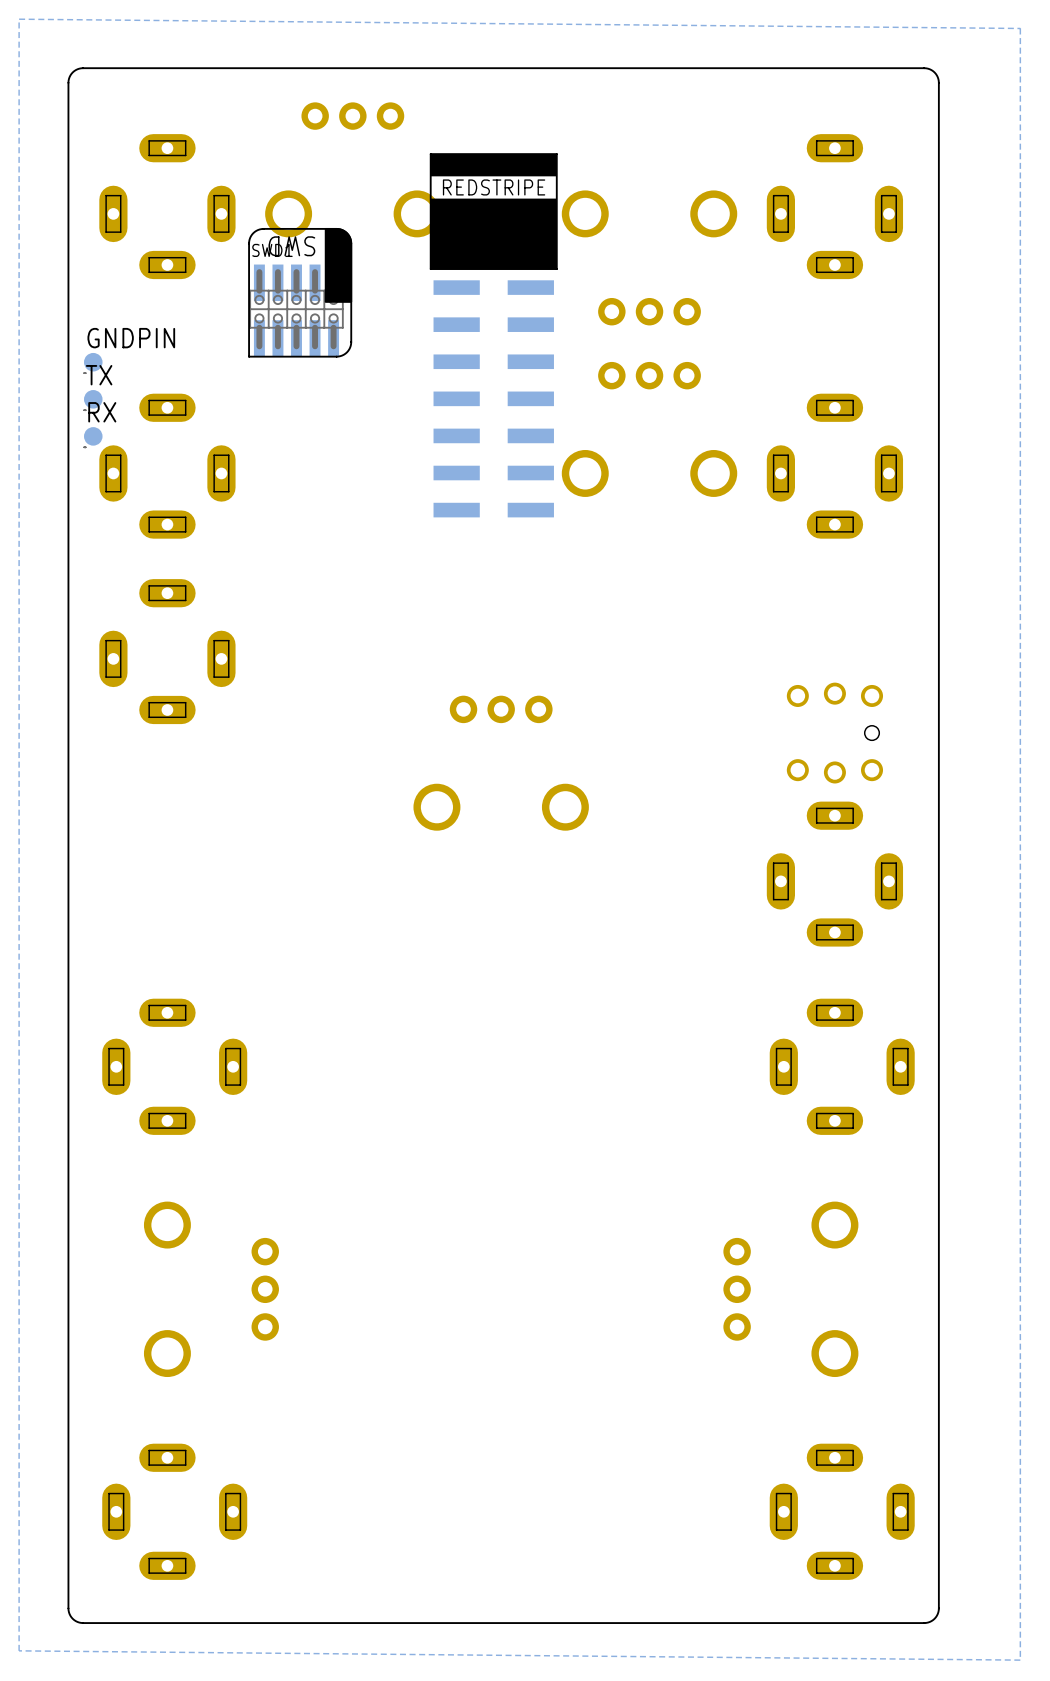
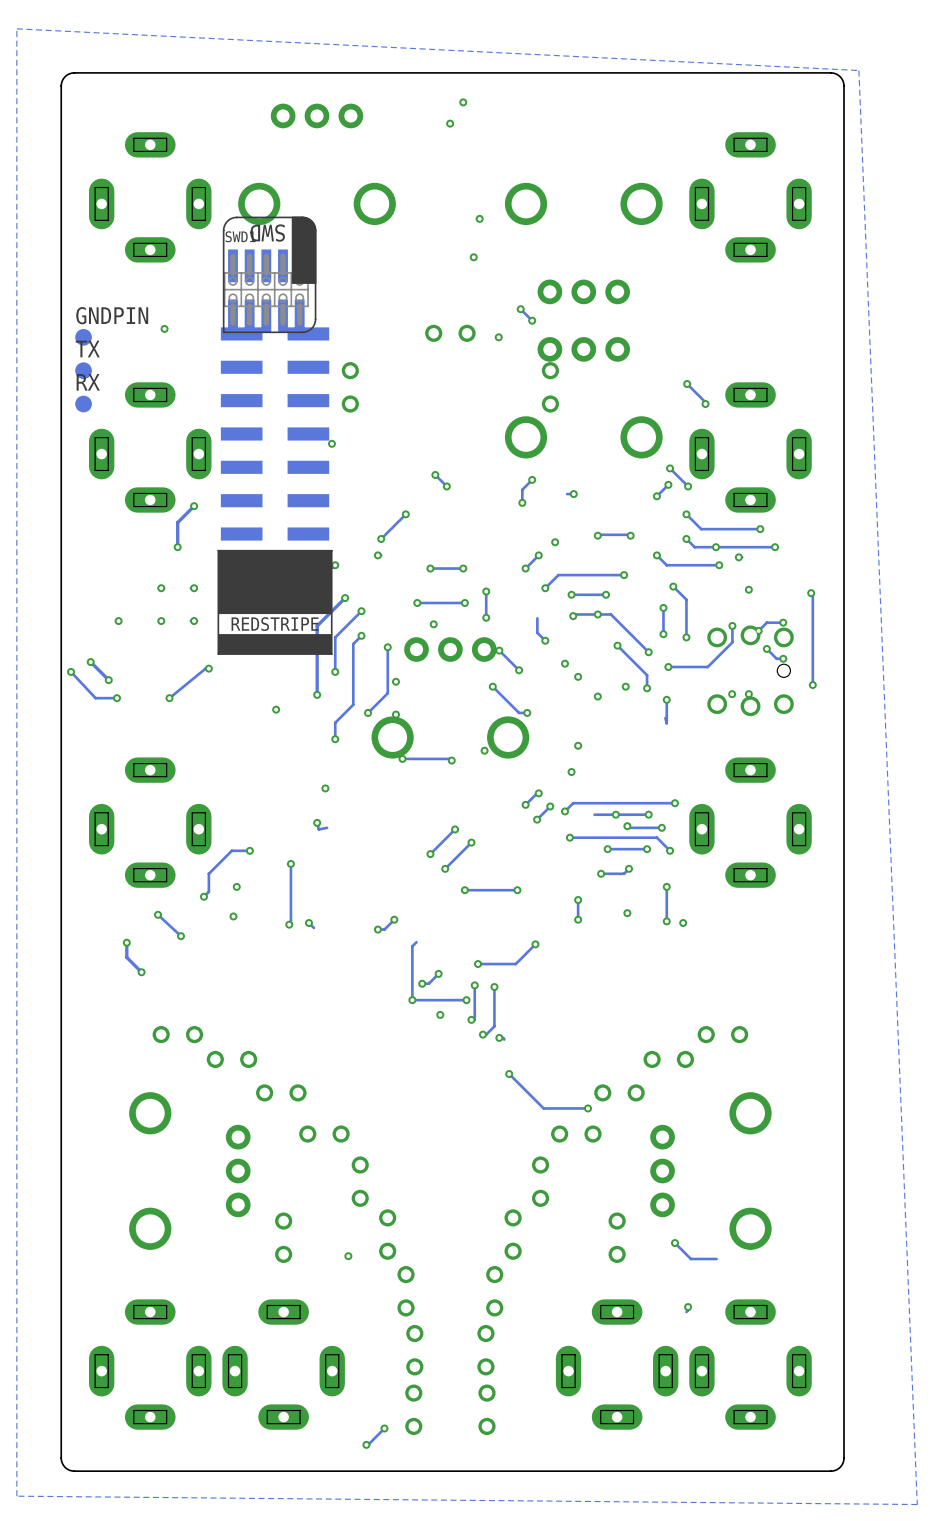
zone outline: (19, 19) (1020, 28) (1020, 1660) -> (16, 28) (858, 70) (917, 1504)
via: none -> (463, 102)
via: none -> (450, 123)
via: none -> (479, 218)
via: none -> (473, 257)
track: none -> (520, 309) (532, 320)
via: none -> (520, 309)
part: (493, 335) -> none
via: none -> (532, 320)
via: none -> (164, 328)
part: none -> (450, 333)
via: none -> (498, 337)
track: none -> (687, 384) (705, 404)
via: none -> (687, 384)
part: none -> (350, 387)
part: none -> (550, 387)
via: none -> (705, 404)
part position: (167, 466) -> (150, 447)
part position: (834, 466) -> (750, 447)
via: none -> (331, 443)
track: none -> (670, 468) (688, 486)
via: none -> (670, 468)
track: none -> (435, 474) (446, 486)
via: none -> (435, 474)
track: none -> (532, 479) (522, 489) (522, 502)
via: none -> (532, 479)
track: none -> (668, 484) (656, 496)
via: none -> (668, 484)
via: none -> (446, 486)
via: none -> (688, 486)
part: none -> (275, 491)
track: none -> (573, 494) (567, 494)
via: none -> (573, 494)
via: none -> (656, 496)
via: none -> (522, 502)
track: none -> (194, 506) (177, 522) (177, 547)
via: none -> (194, 506)
track: none -> (405, 514) (381, 538)
via: none -> (405, 514)
track: none -> (686, 514) (701, 529) (760, 529)
via: none -> (686, 514)
via: none -> (760, 529)
via: none -> (597, 535)
track: none -> (630, 535) (597, 535)
via: none -> (630, 535)
via: none -> (381, 538)
track: none -> (686, 538) (694, 547) (775, 547)
via: none -> (686, 538)
via: none -> (555, 542)
via: none -> (177, 547)
via: none -> (715, 547)
via: none -> (775, 547)
via: none -> (377, 555)
track: none -> (538, 555) (525, 568)
via: none -> (538, 555)
track: none -> (656, 555) (666, 565) (719, 565)
via: none -> (656, 555)
via: none -> (738, 557)
via: none -> (335, 565)
via: none -> (719, 565)
via: none -> (430, 568)
track: none -> (463, 568) (430, 568)
via: none -> (463, 568)
via: none -> (525, 568)
track: none -> (624, 575) (558, 575) (545, 588)
via: none -> (624, 575)
track: none -> (673, 586) (686, 599) (686, 637)
via: none -> (673, 586)
via: none -> (161, 588)
via: none -> (194, 588)
via: none -> (545, 588)
via: none -> (748, 589)
track: none -> (486, 591) (486, 617)
via: none -> (486, 591)
track: none -> (811, 593) (812, 594) (812, 685)
via: none -> (811, 593)
via: none -> (571, 594)
track: none -> (606, 594) (571, 594)
via: none -> (606, 594)
part: (167, 651) -> none
track: none -> (345, 598) (317, 625) (317, 694)
via: none -> (345, 598)
via: none -> (417, 602)
track: none -> (464, 602) (417, 602)
via: none -> (464, 602)
track: none -> (663, 607) (663, 634)
via: none -> (663, 607)
track: none -> (361, 611) (335, 637) (335, 671)
via: none -> (361, 611)
via: none -> (597, 614)
track: none -> (573, 616) (574, 614) (610, 614) (648, 652)
via: none -> (573, 616)
via: none -> (486, 617)
track: none -> (537, 618) (537, 632) (545, 640)
via: none -> (118, 621)
via: none -> (161, 621)
via: none -> (194, 621)
track: none -> (783, 622) (766, 622) (758, 630)
via: none -> (783, 622)
via: none -> (433, 624)
track: none -> (732, 625) (732, 642) (707, 667) (668, 667)
via: none -> (732, 625)
via: none -> (758, 630)
via: none -> (663, 634)
track: none -> (361, 635) (353, 644) (353, 704) (335, 722) (335, 739)
via: none -> (361, 635)
via: none -> (686, 637)
via: none -> (545, 640)
track: none -> (617, 645) (647, 675) (647, 688)
via: none -> (617, 645)
track: none -> (387, 647) (387, 693) (368, 712)
via: none -> (387, 647)
track: none -> (766, 648) (776, 658) (783, 658)
via: none -> (766, 648)
track: none -> (499, 650) (519, 670)
via: none -> (499, 650)
via: none -> (648, 652)
via: none -> (783, 658)
track: none -> (90, 662) (108, 680)
via: none -> (90, 662)
via: none -> (565, 663)
via: none -> (668, 667)
track: none -> (208, 668) (205, 668) (169, 698)
via: none -> (208, 668)
via: none -> (519, 670)
track: none -> (71, 671) (95, 698) (116, 698)
via: none -> (71, 671)
via: none -> (335, 671)
via: none -> (578, 676)
via: none -> (108, 680)
via: none -> (395, 681)
via: none -> (812, 685)
track: none -> (492, 686) (519, 712) (527, 712)
via: none -> (492, 686)
via: none -> (625, 686)
via: none -> (647, 688)
via: none -> (317, 694)
via: none -> (732, 694)
via: none -> (748, 694)
via: none -> (597, 696)
via: none -> (116, 698)
via: none -> (169, 698)
track: none -> (666, 699) (666, 723) (665, 718)
via: none -> (666, 699)
via: none -> (276, 709)
via: none -> (368, 712)
via: none -> (527, 712)
via: none -> (395, 714)
via: none -> (335, 739)
via: none -> (578, 745)
via: none -> (484, 750)
track: none -> (402, 758) (450, 758) (451, 760)
via: none -> (402, 758)
via: none -> (451, 760)
via: none -> (571, 772)
via: none -> (325, 788)
track: none -> (538, 793) (525, 804)
via: none -> (538, 793)
part position: (834, 874) -> (750, 822)
track: none -> (674, 803) (573, 803) (565, 811)
via: none -> (674, 803)
via: none -> (525, 804)
track: none -> (550, 806) (537, 819)
via: none -> (550, 806)
via: none -> (565, 811)
via: none -> (615, 814)
track: none -> (648, 814) (594, 814)
via: none -> (648, 814)
via: none -> (537, 819)
part: none -> (150, 822)
track: none -> (317, 822) (318, 829) (327, 827)
via: none -> (317, 822)
track: none -> (627, 826) (629, 827) (661, 827)
via: none -> (627, 826)
via: none -> (661, 827)
track: none -> (455, 829) (430, 854)
via: none -> (455, 829)
track: none -> (569, 837) (656, 837) (670, 850)
via: none -> (569, 837)
track: none -> (471, 842) (445, 868)
via: none -> (471, 842)
via: none -> (607, 849)
track: none -> (647, 849) (607, 849)
via: none -> (647, 849)
track: none -> (249, 850) (231, 850) (208, 873) (208, 891) (203, 896)
via: none -> (249, 850)
via: none -> (670, 850)
via: none -> (430, 854)
track: none -> (290, 863) (290, 923) (289, 924)
via: none -> (290, 863)
via: none -> (445, 868)
track: none -> (629, 868) (624, 873) (601, 873)
via: none -> (629, 868)
via: none -> (601, 873)
via: none -> (236, 886)
track: none -> (666, 886) (666, 921)
via: none -> (666, 886)
via: none -> (464, 890)
track: none -> (517, 890) (464, 890)
via: none -> (517, 890)
via: none -> (203, 896)
track: none -> (578, 900) (578, 919)
via: none -> (578, 900)
via: none -> (627, 913)
track: none -> (158, 914) (180, 936)
via: none -> (158, 914)
via: none -> (233, 916)
track: none -> (394, 919) (384, 929) (377, 929)
via: none -> (394, 919)
via: none -> (578, 919)
via: none -> (666, 921)
track: none -> (308, 923) (313, 927)
via: none -> (308, 923)
via: none -> (683, 923)
via: none -> (289, 924)
via: none -> (377, 929)
via: none -> (180, 936)
track: none -> (416, 942) (412, 946) (412, 1000) (466, 1000)
track: none -> (126, 942) (126, 957) (141, 972)
via: none -> (126, 942)
track: none -> (535, 944) (515, 964) (478, 964)
via: none -> (535, 944)
via: none -> (478, 964)
part: (174, 1066) -> none
part: (842, 1066) -> none
via: none -> (141, 972)
track: none -> (438, 973) (428, 983) (422, 983)
via: none -> (438, 973)
via: none -> (422, 983)
track: none -> (474, 985) (474, 1019) (471, 1019)
via: none -> (474, 985)
track: none -> (494, 987) (494, 1026) (486, 1034) (482, 1034)
via: none -> (494, 987)
via: none -> (412, 1000)
via: none -> (466, 1000)
via: none -> (440, 1014)
via: none -> (471, 1019)
part: none -> (177, 1034)
via: none -> (482, 1034)
part: none -> (722, 1034)
track: none -> (499, 1037) (504, 1039)
via: none -> (499, 1037)
part: none -> (232, 1059)
part: none -> (668, 1059)
track: none -> (509, 1074) (543, 1108) (587, 1108)
via: none -> (509, 1074)
part: none -> (281, 1092)
part: none -> (619, 1092)
via: none -> (587, 1108)
part: none -> (324, 1134)
part: none -> (576, 1134)
part: none -> (360, 1181)
part: none -> (540, 1181)
part: none -> (387, 1234)
part: none -> (513, 1234)
part: none -> (283, 1237)
part: none -> (617, 1237)
track: none -> (674, 1243) (690, 1259) (716, 1259)
via: none -> (674, 1243)
via: none -> (348, 1256)
part: none -> (406, 1291)
part: none -> (494, 1291)
track: none -> (688, 1307) (686, 1311)
via: none -> (688, 1307)
part: none -> (414, 1350)
part: none -> (485, 1350)
part: none -> (283, 1364)
part: none -> (617, 1364)
part rotation: 0° (174, 1511) -> 90° counterclockwise (150, 1364)
part rotation: 0° (842, 1511) -> 90° counterclockwise (750, 1364)
part: none -> (413, 1409)
part: none -> (486, 1409)
track: none -> (384, 1428) (366, 1444)
via: none -> (384, 1428)
via: none -> (366, 1444)

